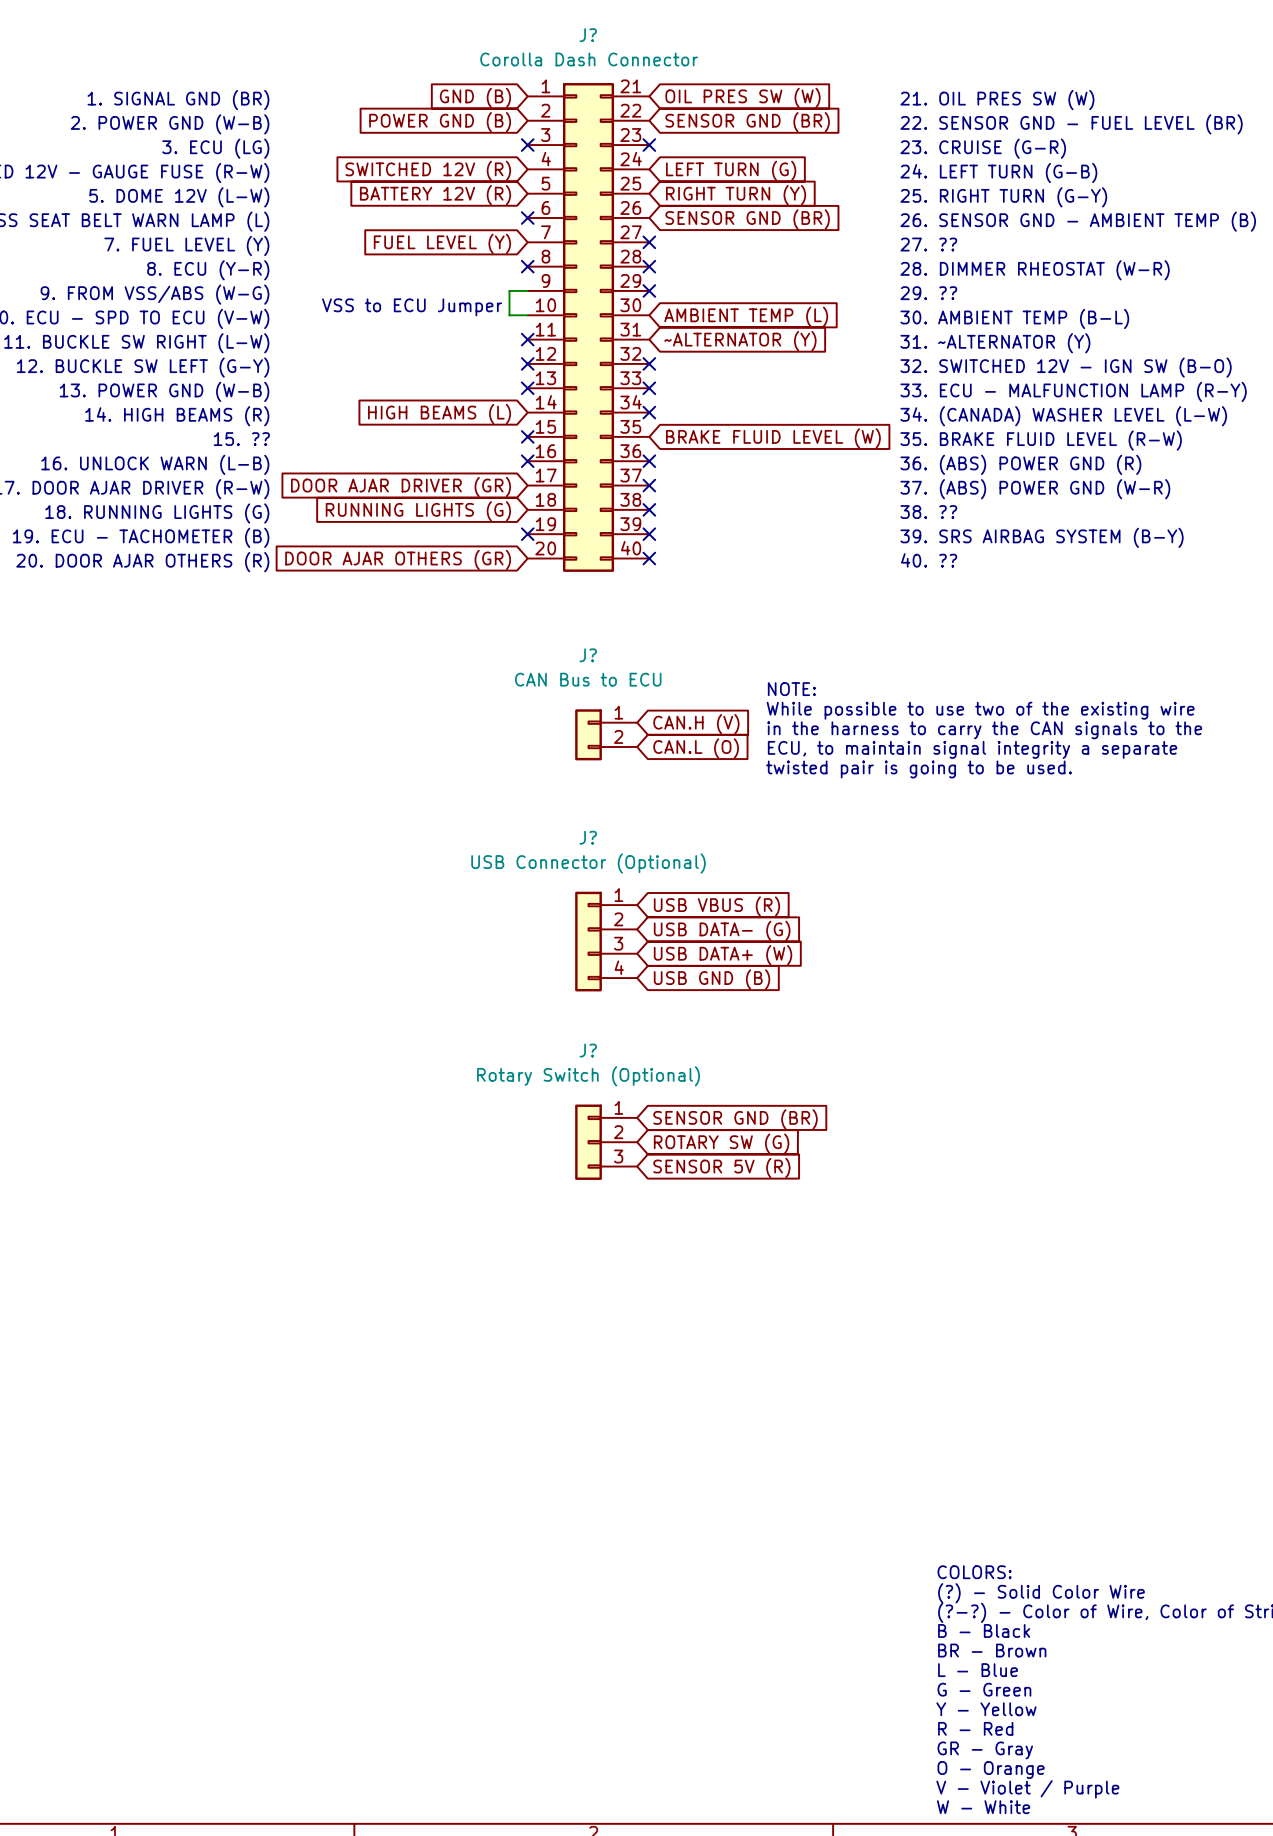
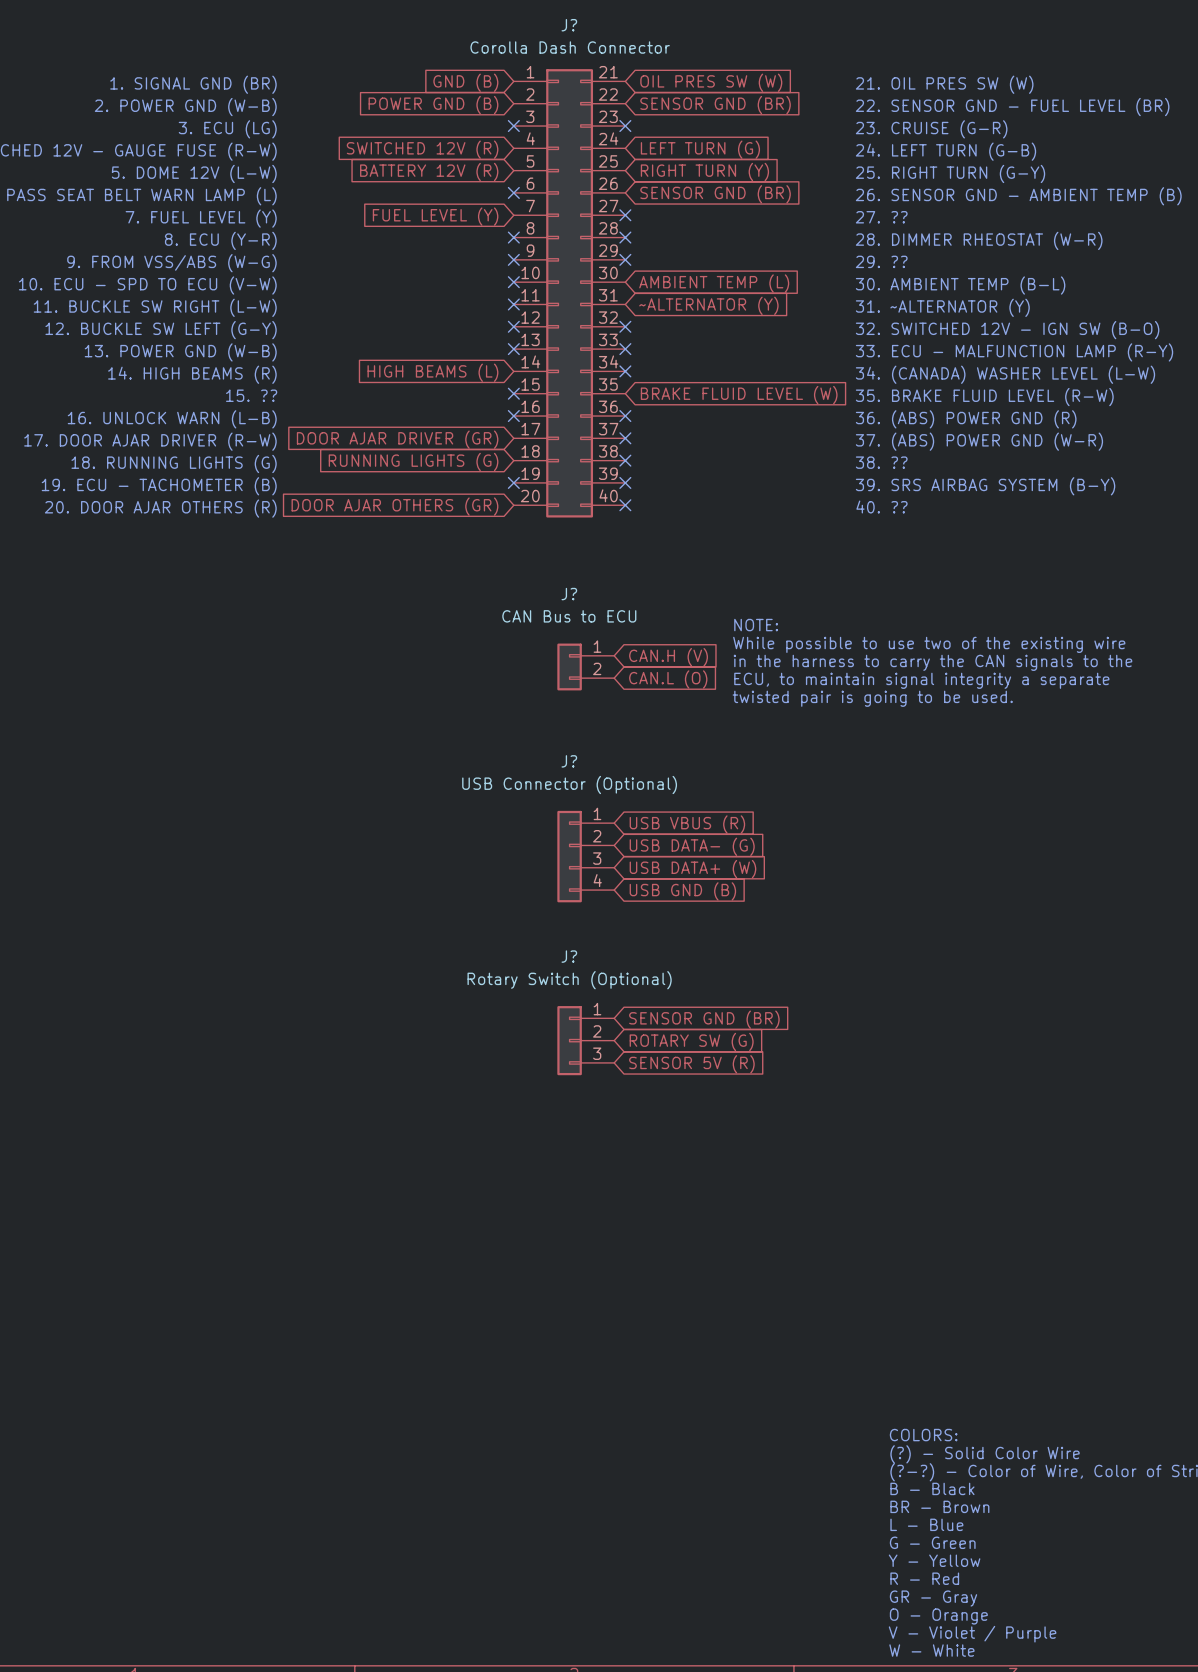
wire: (527, 290) (509, 290) (509, 315) (527, 315) -> none
no-connect mark: none -> (513, 259)
text: VSS to ECU Jumper (412, 307) -> none
no-connect mark: none -> (513, 282)

